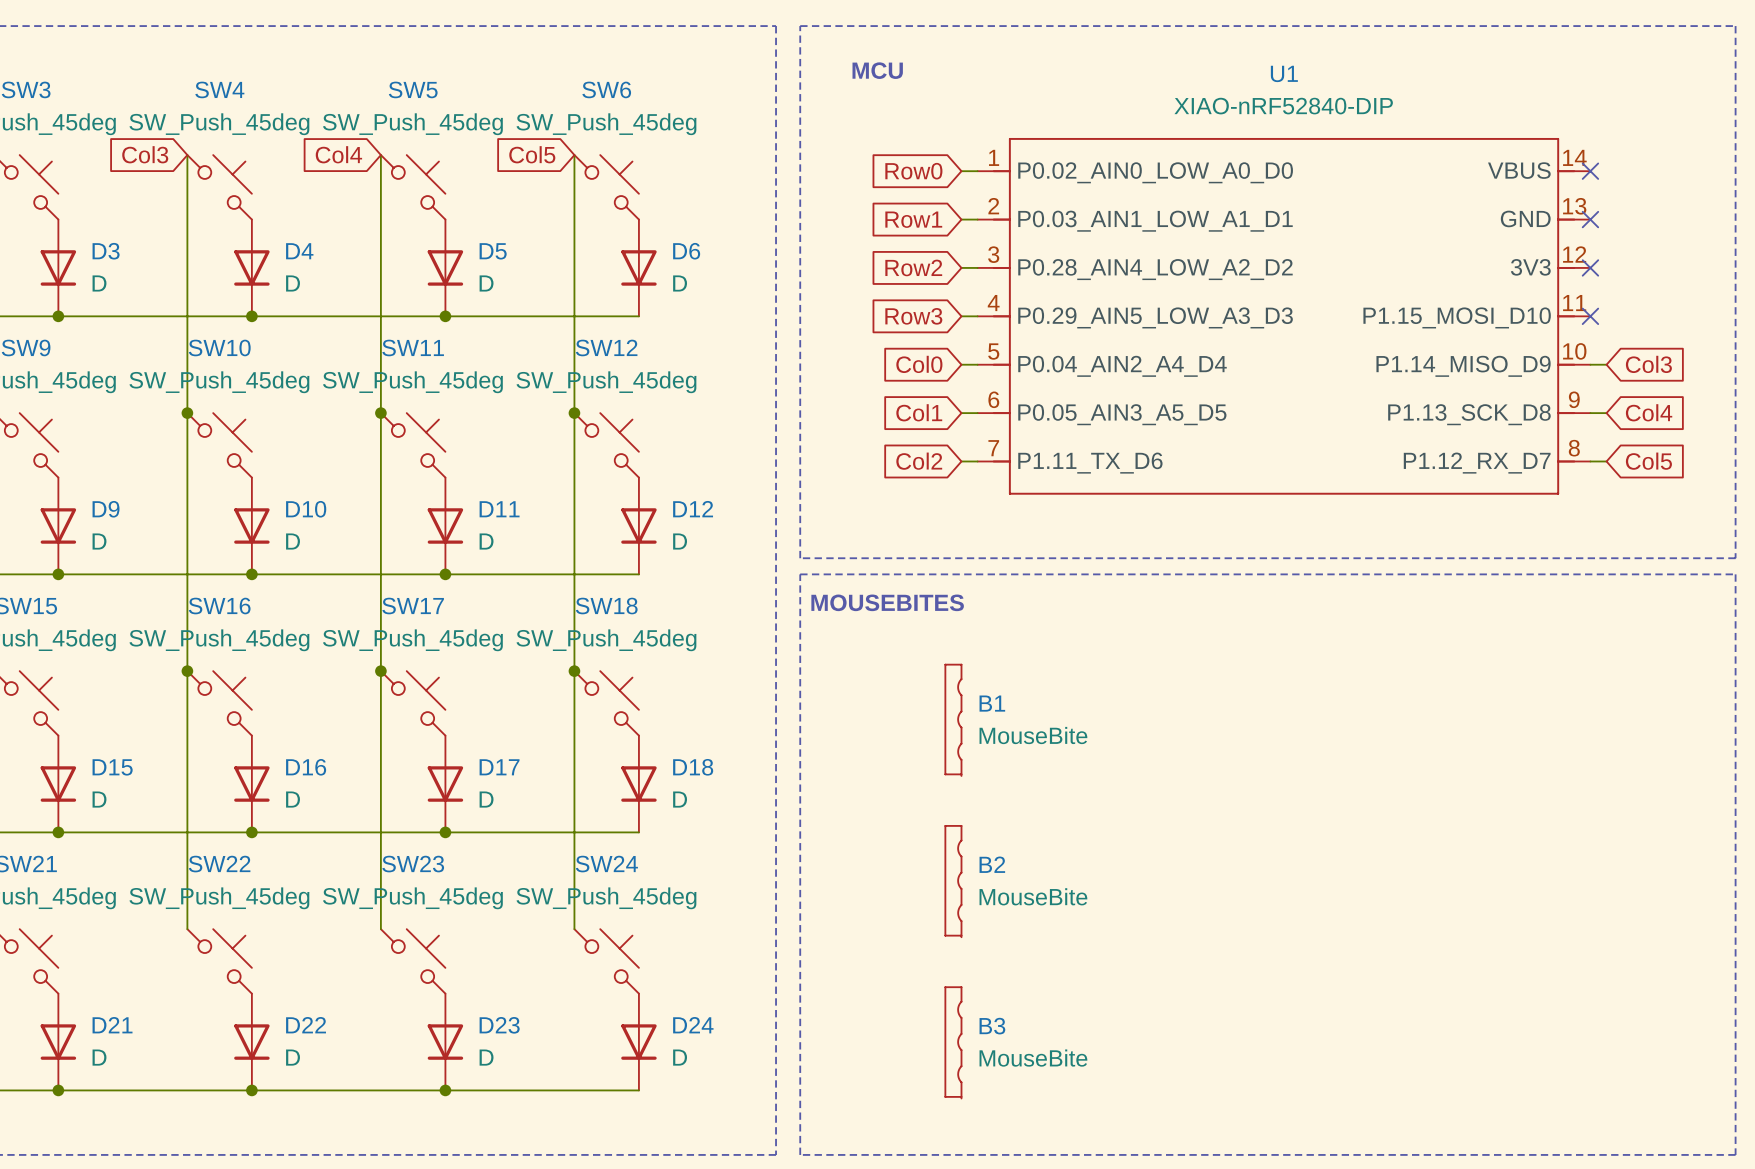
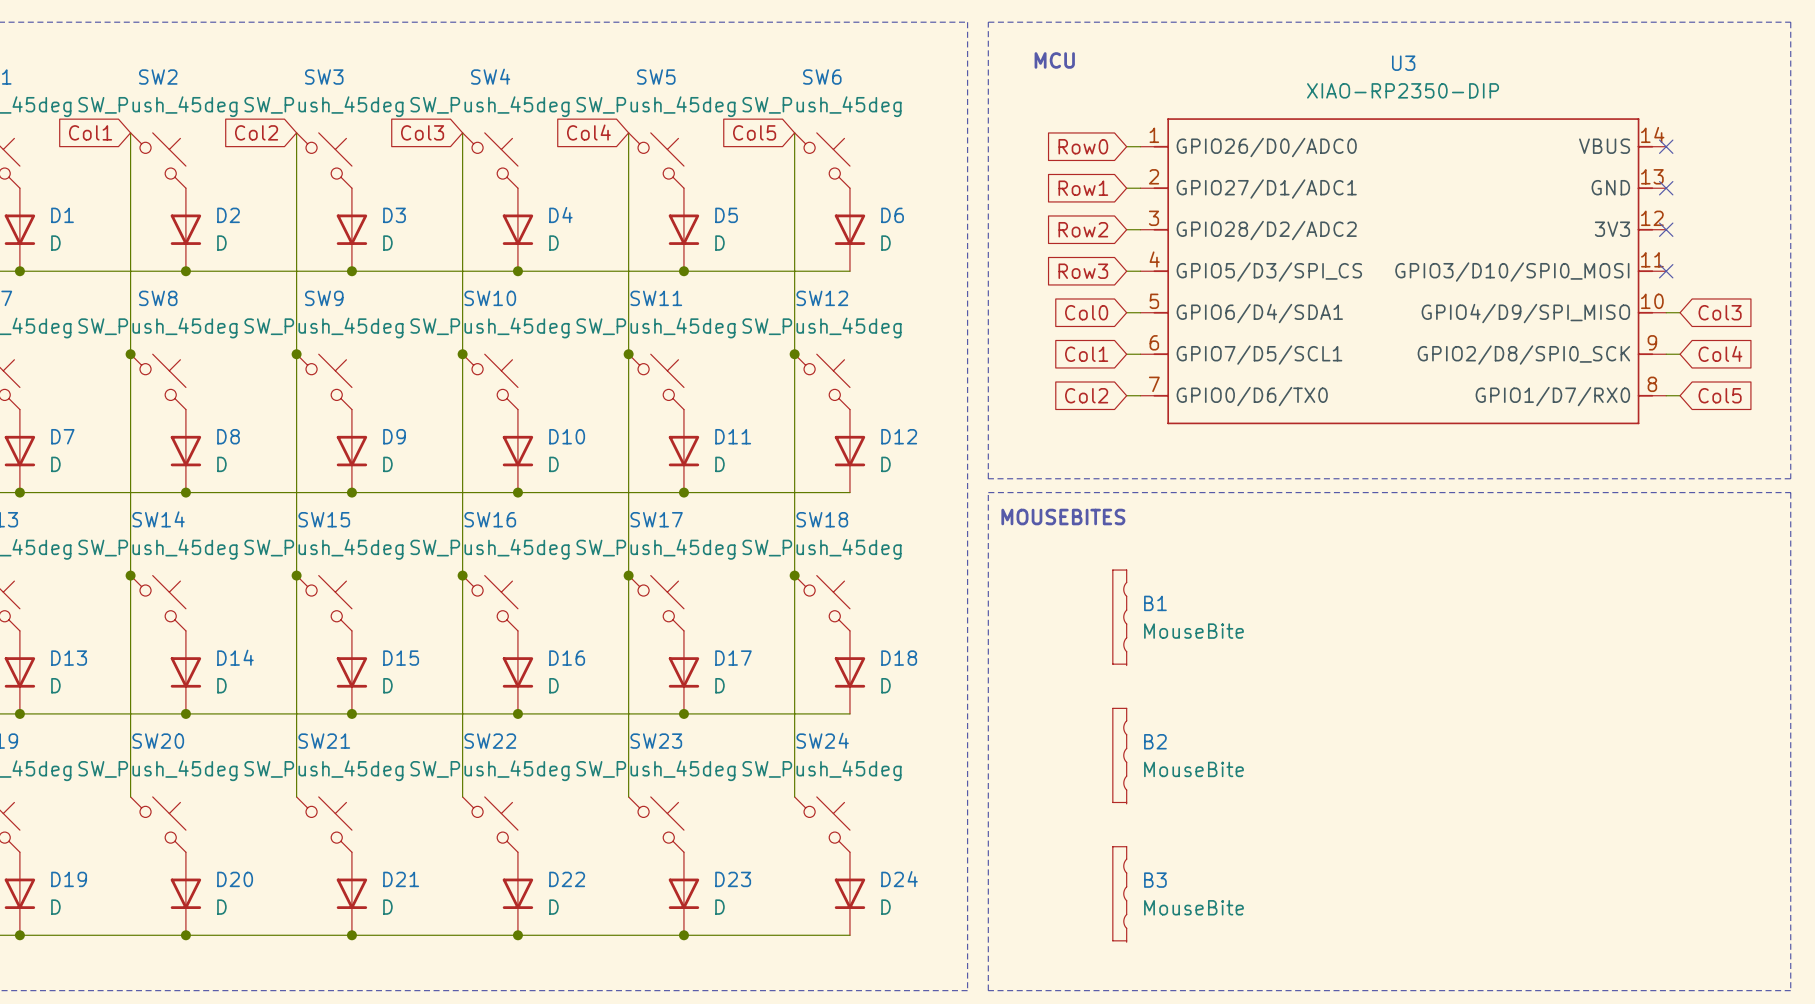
U1 name: U1 (1284, 73) -> U3 (1403, 63)
U1 value: XIAO-nRF52840-DIP (1283, 106) -> XIAO-RP2350-DIP (1403, 90)
U1 symbol: [977, 137, 1591, 495] -> [1140, 118, 1667, 425]

